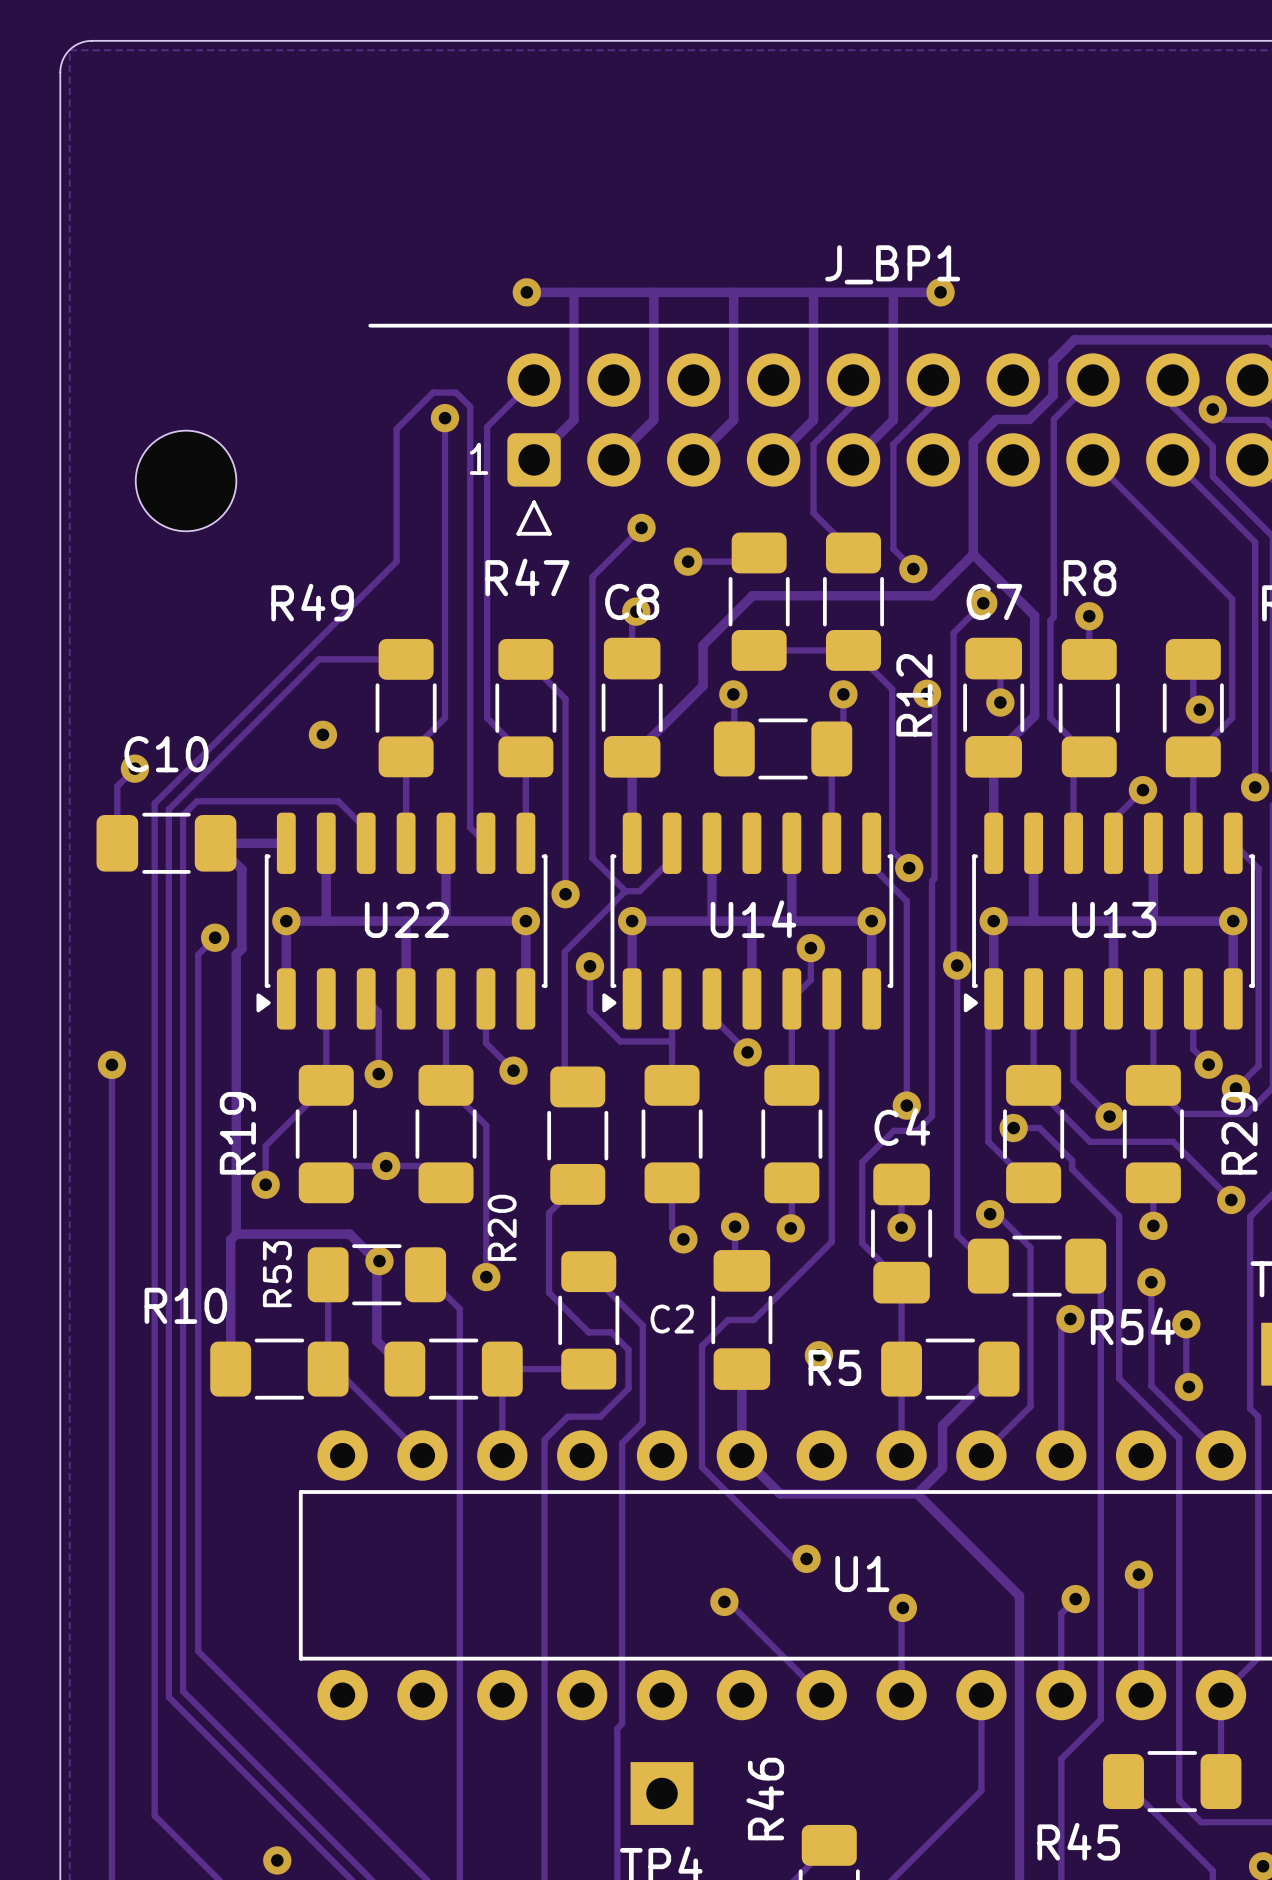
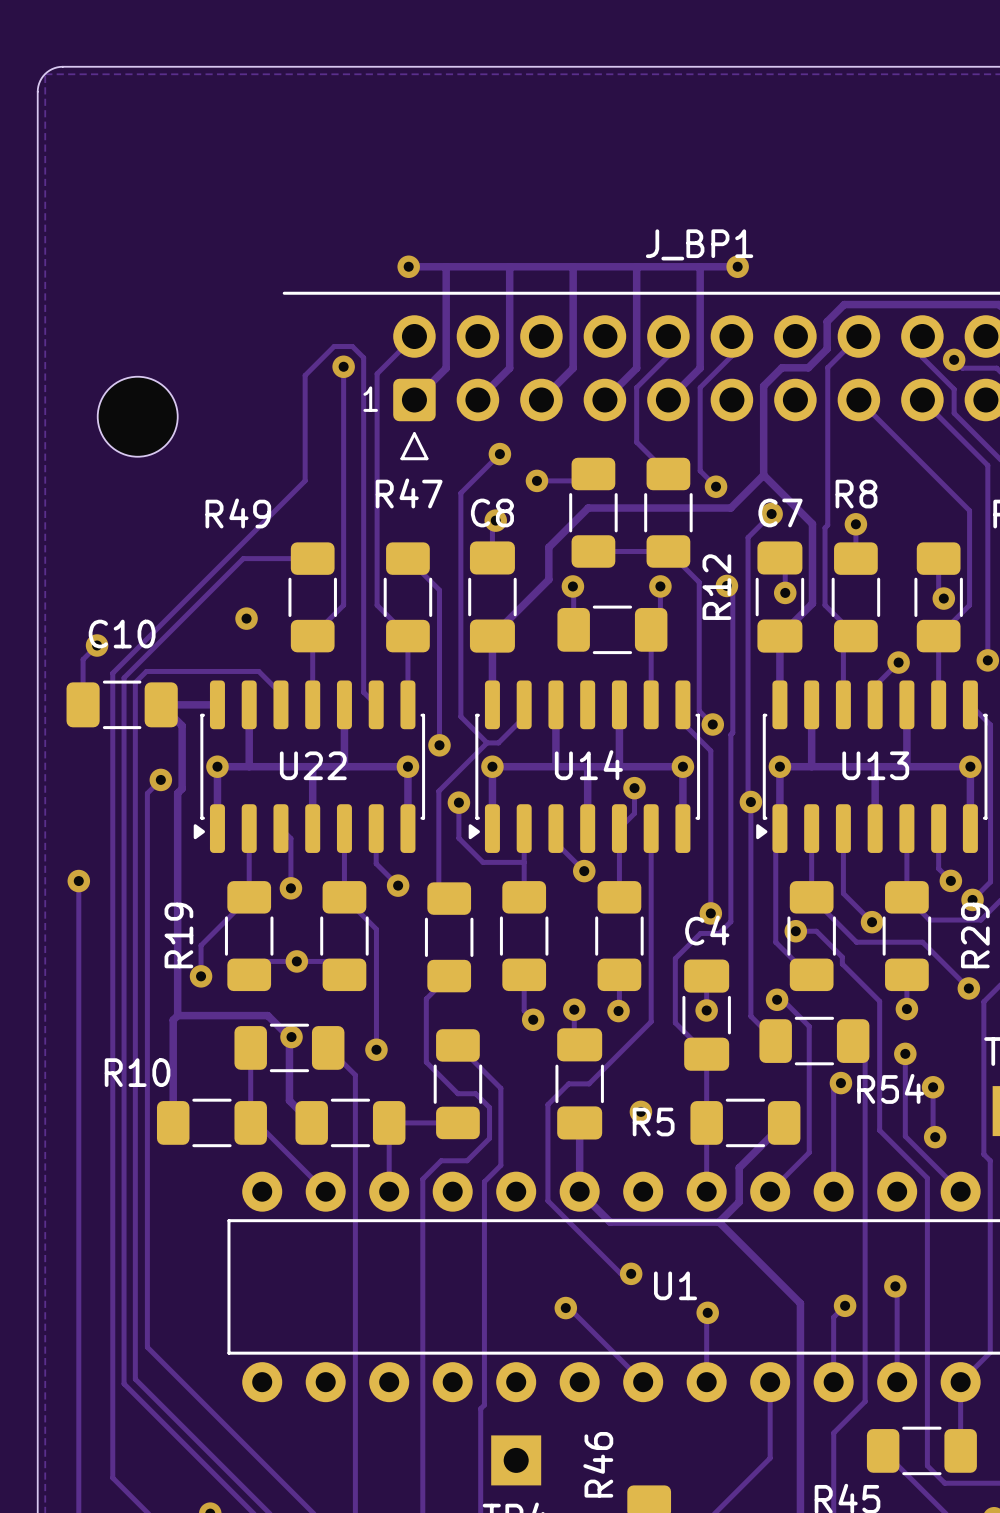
R20 name: R20 (502, 1227) -> none
R53 name: R53 (277, 1274) -> none
C2 name: C2 (672, 1319) -> none

